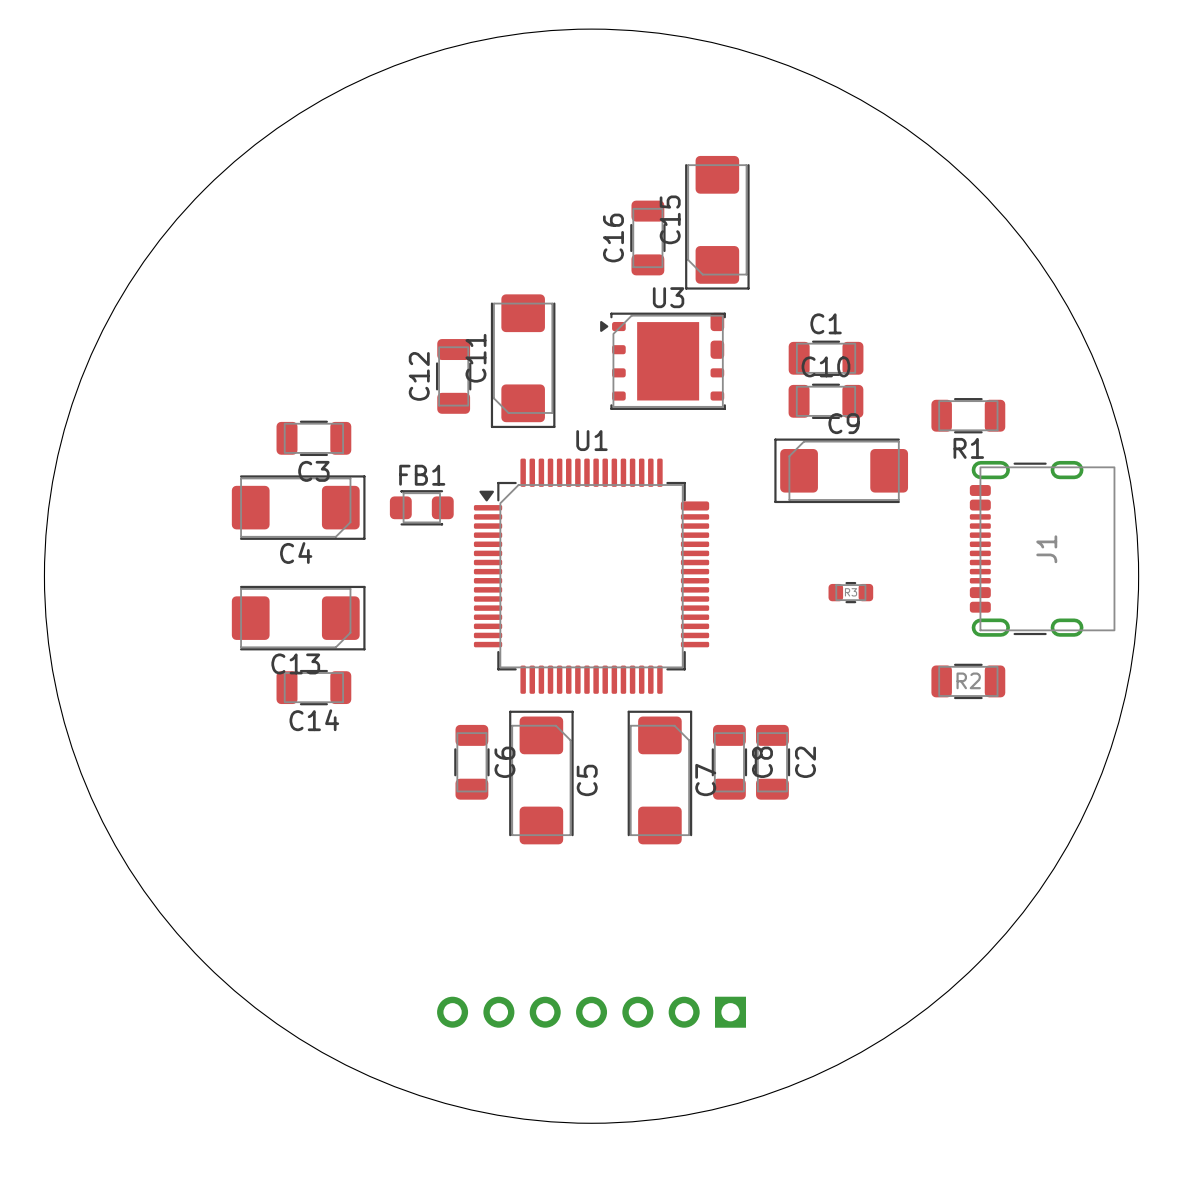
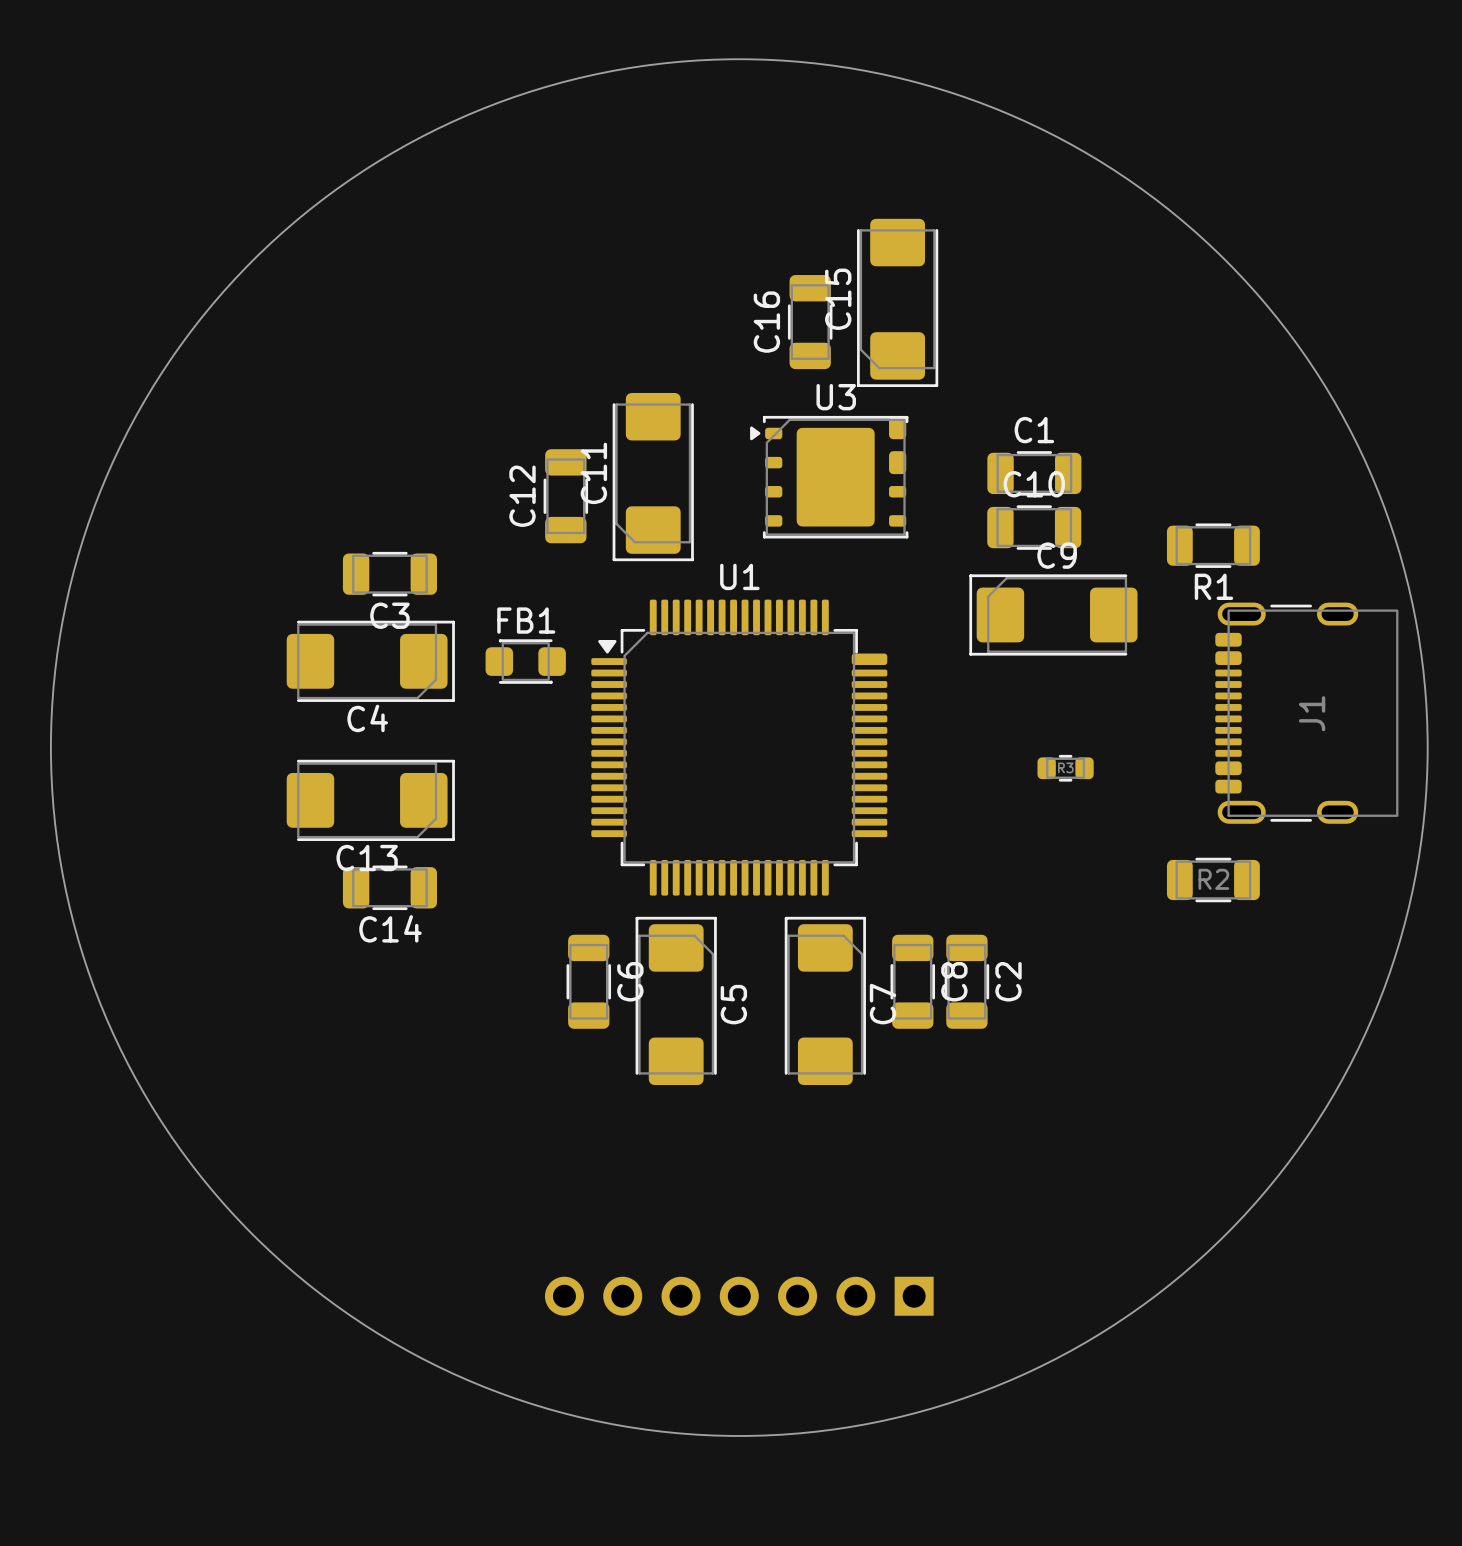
U3 footprint: [600, 312, 726, 410] -> [750, 415, 909, 539]

